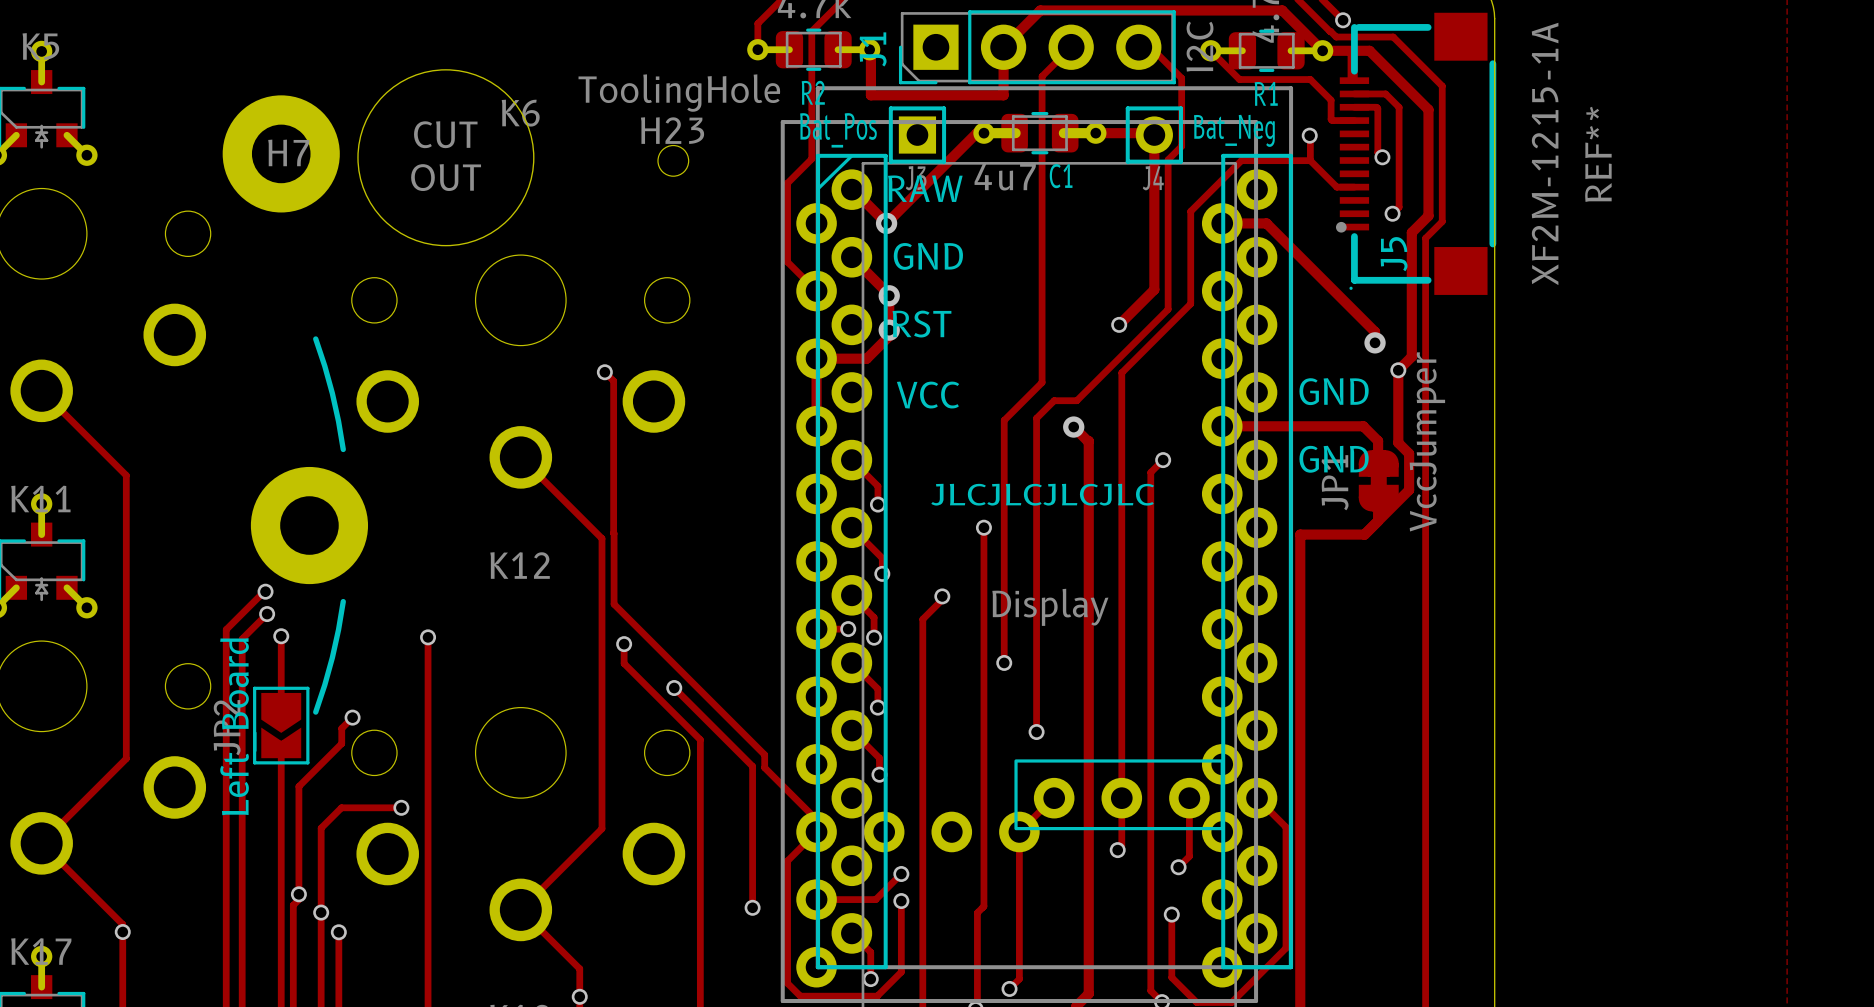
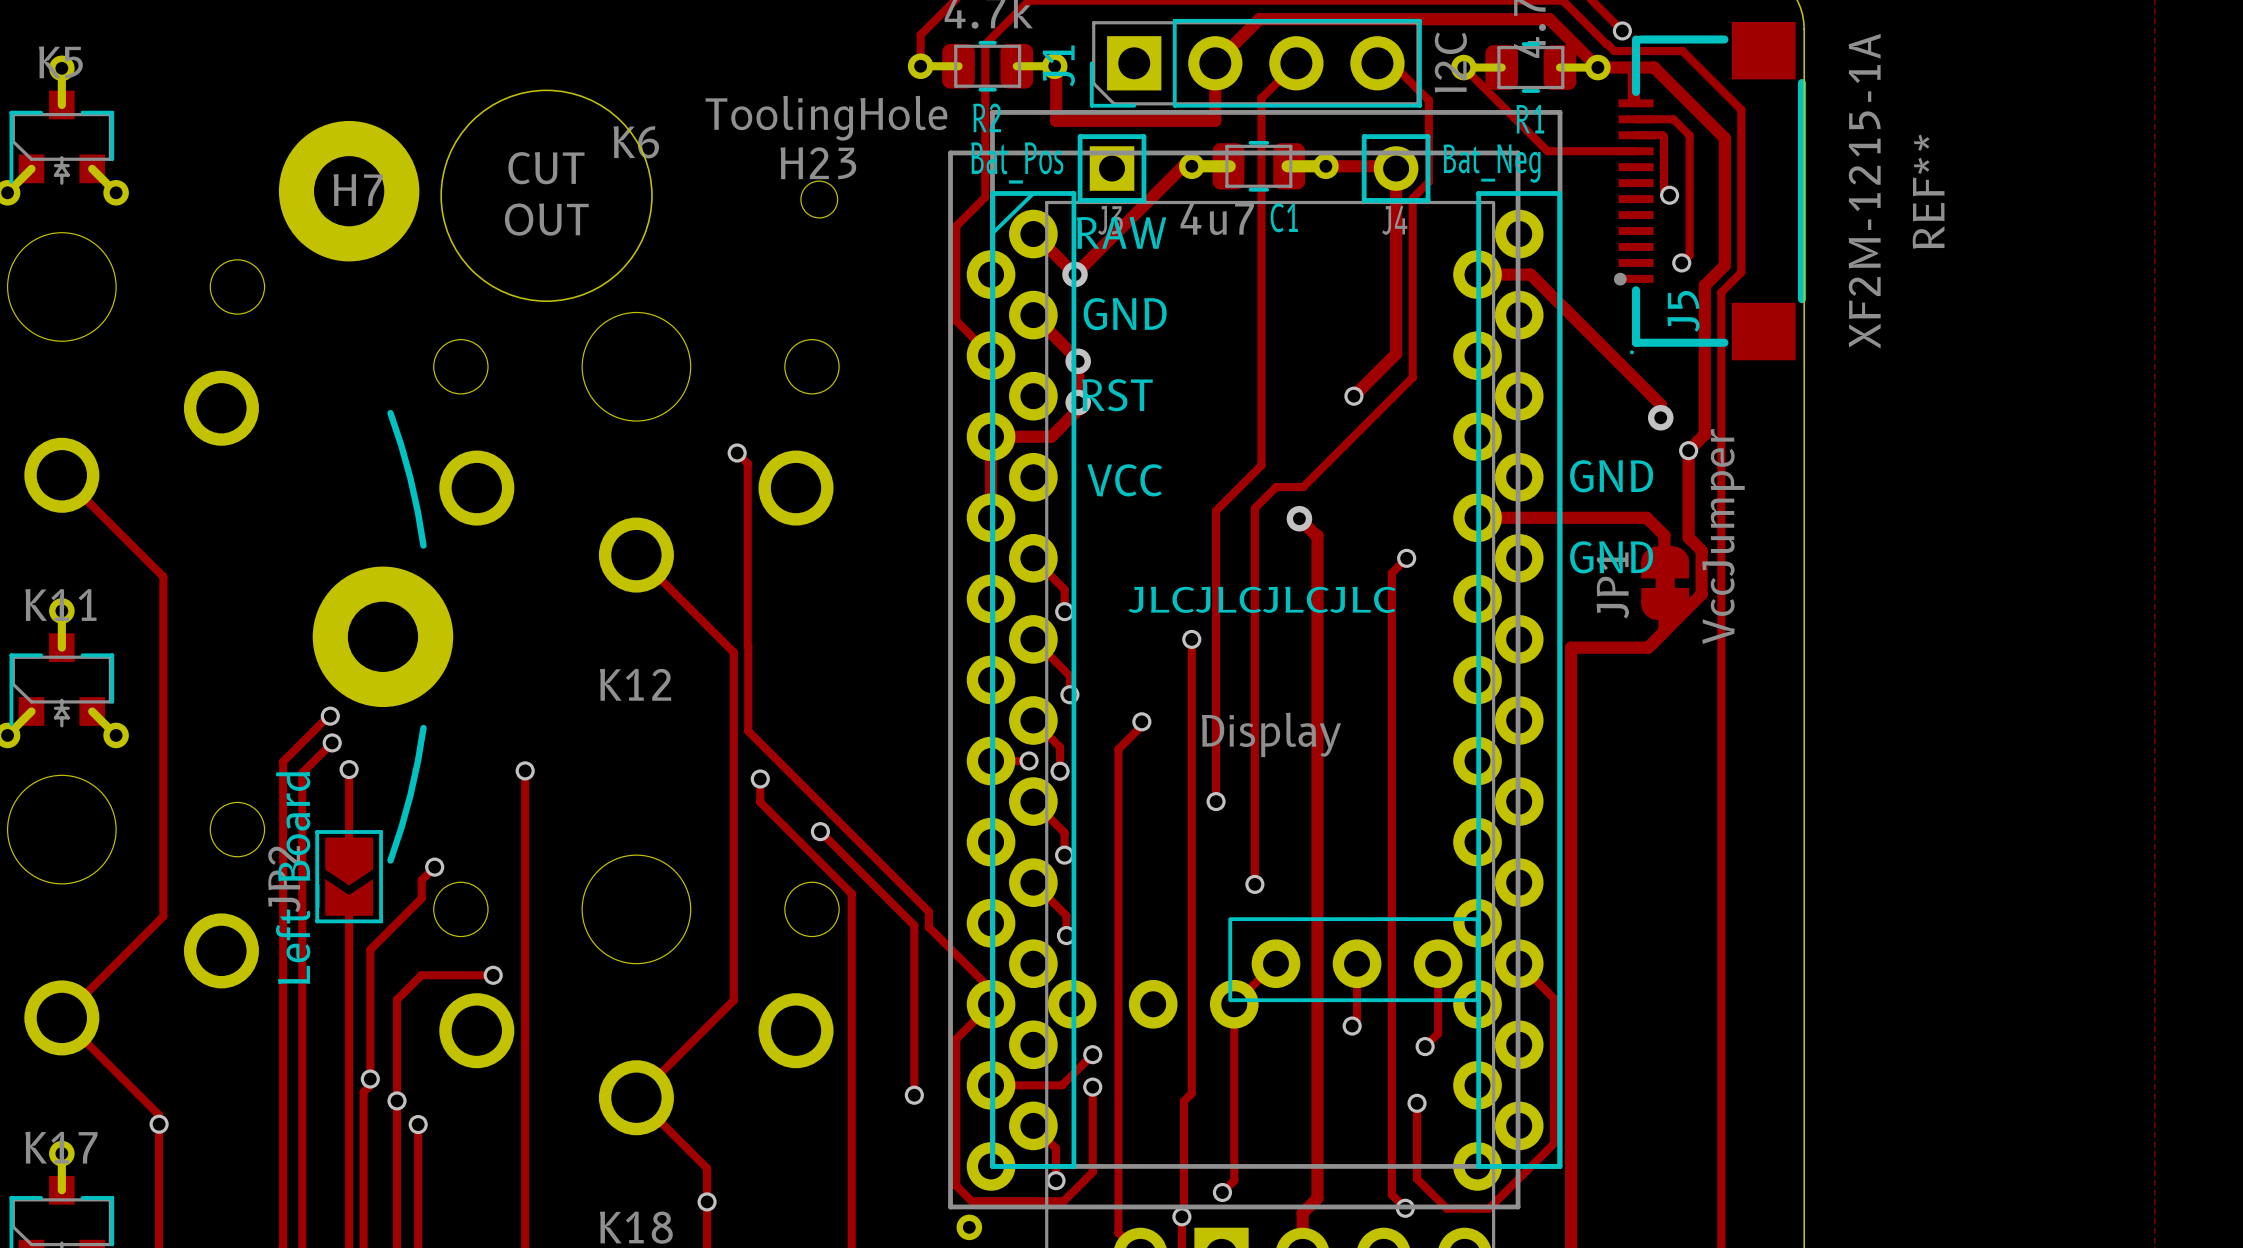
track: (1239, 79) (1310, 79) (1331, 100) (1332, 120) -> (1498, 102) (1547, 151) (1609, 151)
via: (1309, 135) -> none
track: (1310, 135) (1310, 160) -> none
track: (1310, 160) (1336, 187) (1354, 187) -> none
track: (1310, 160) (1241, 160) (1190, 211) (1190, 303) (1121, 372) (1121, 798) -> none

